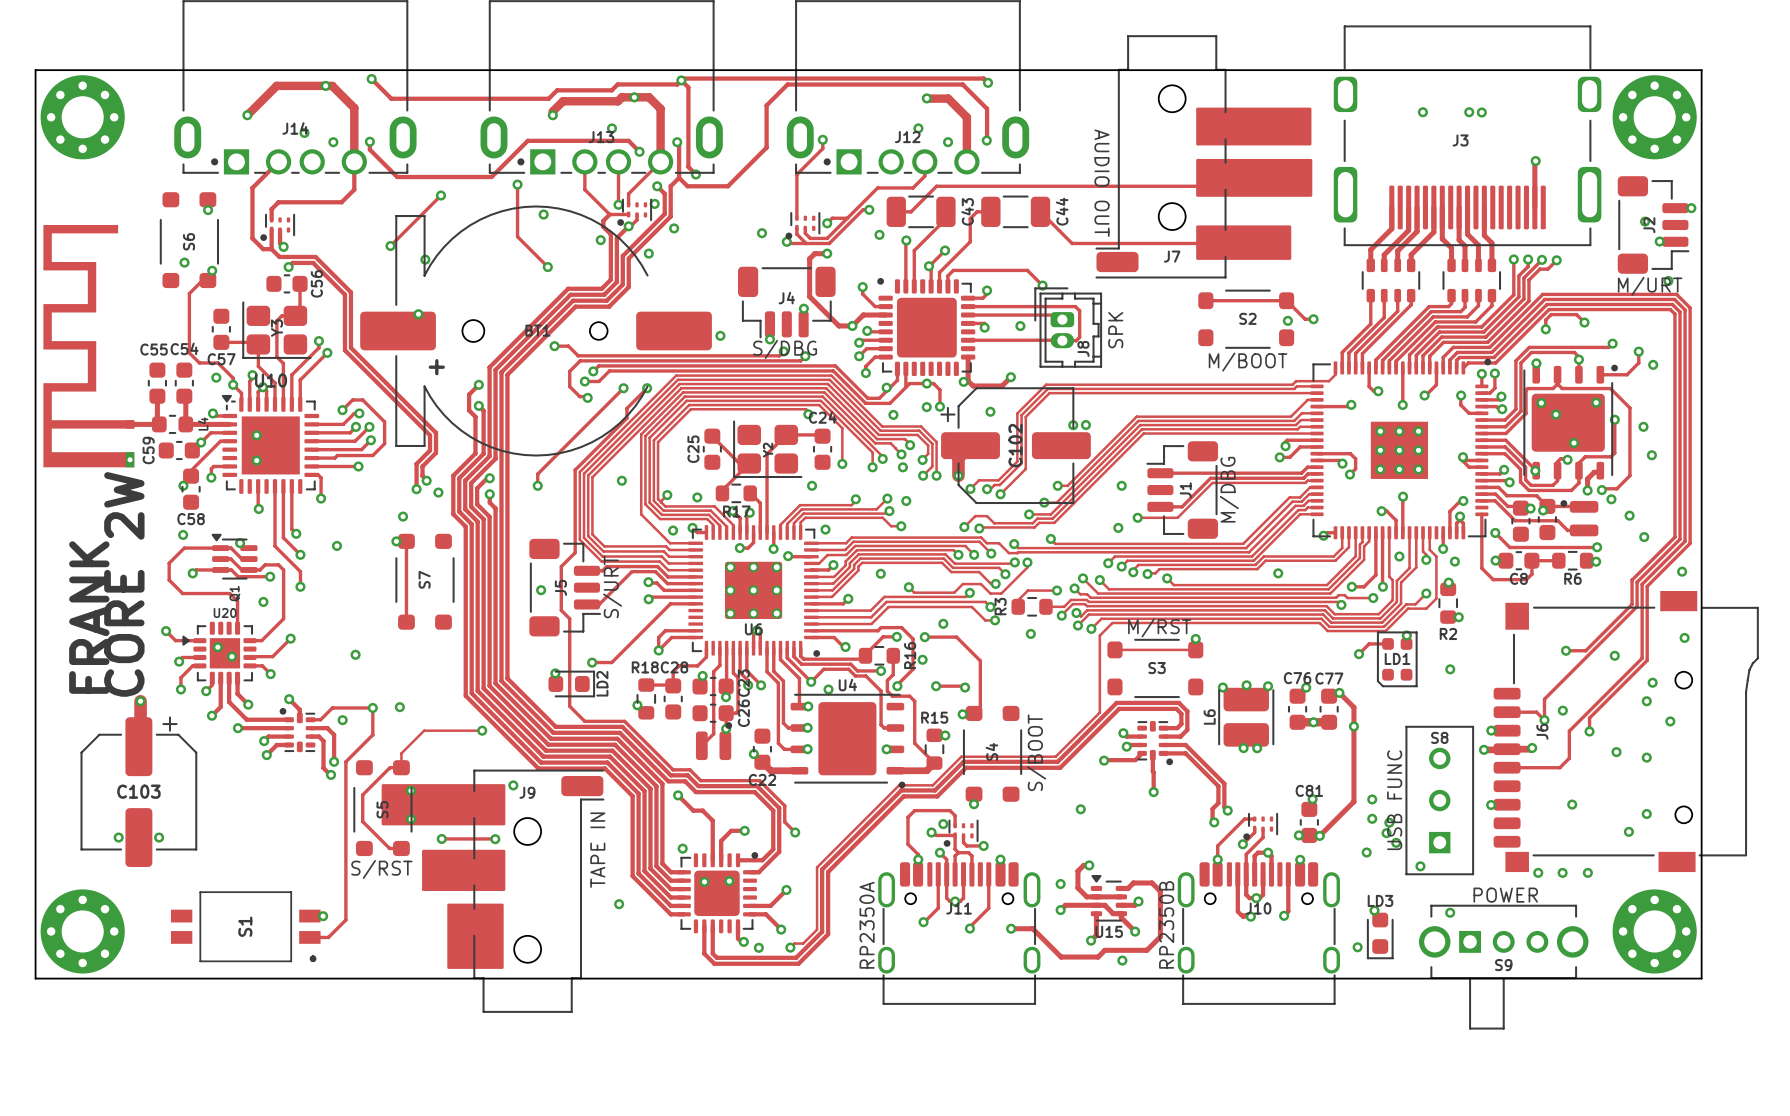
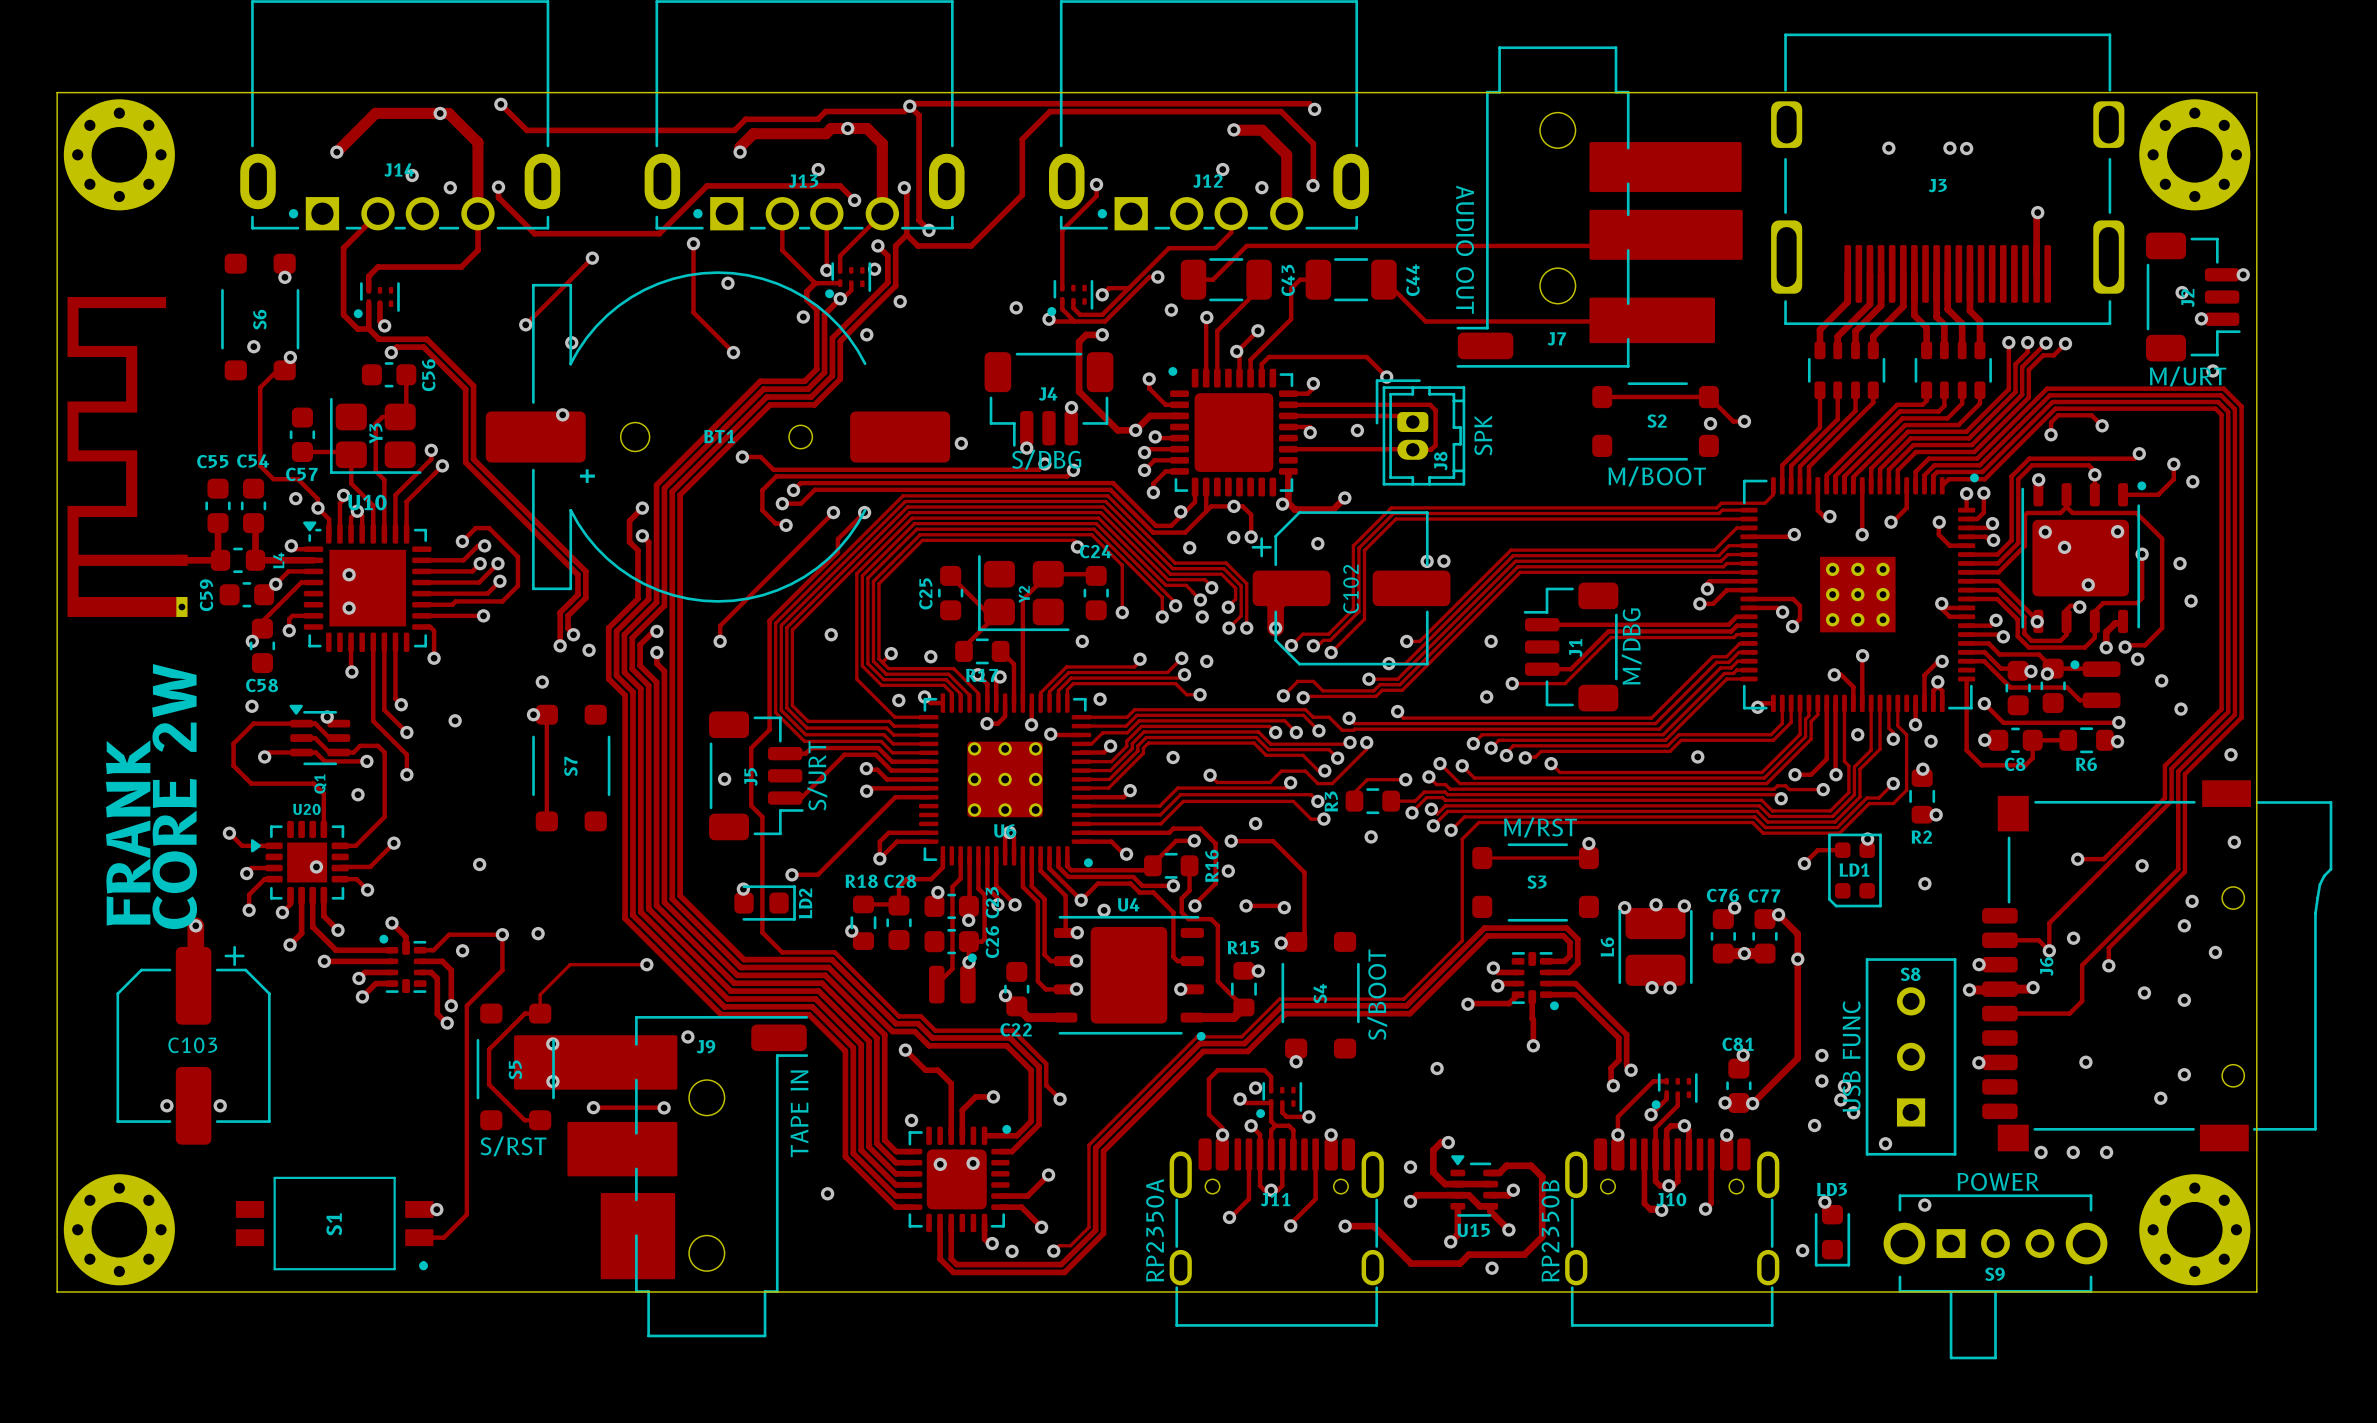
via: (217, 647) -> none

